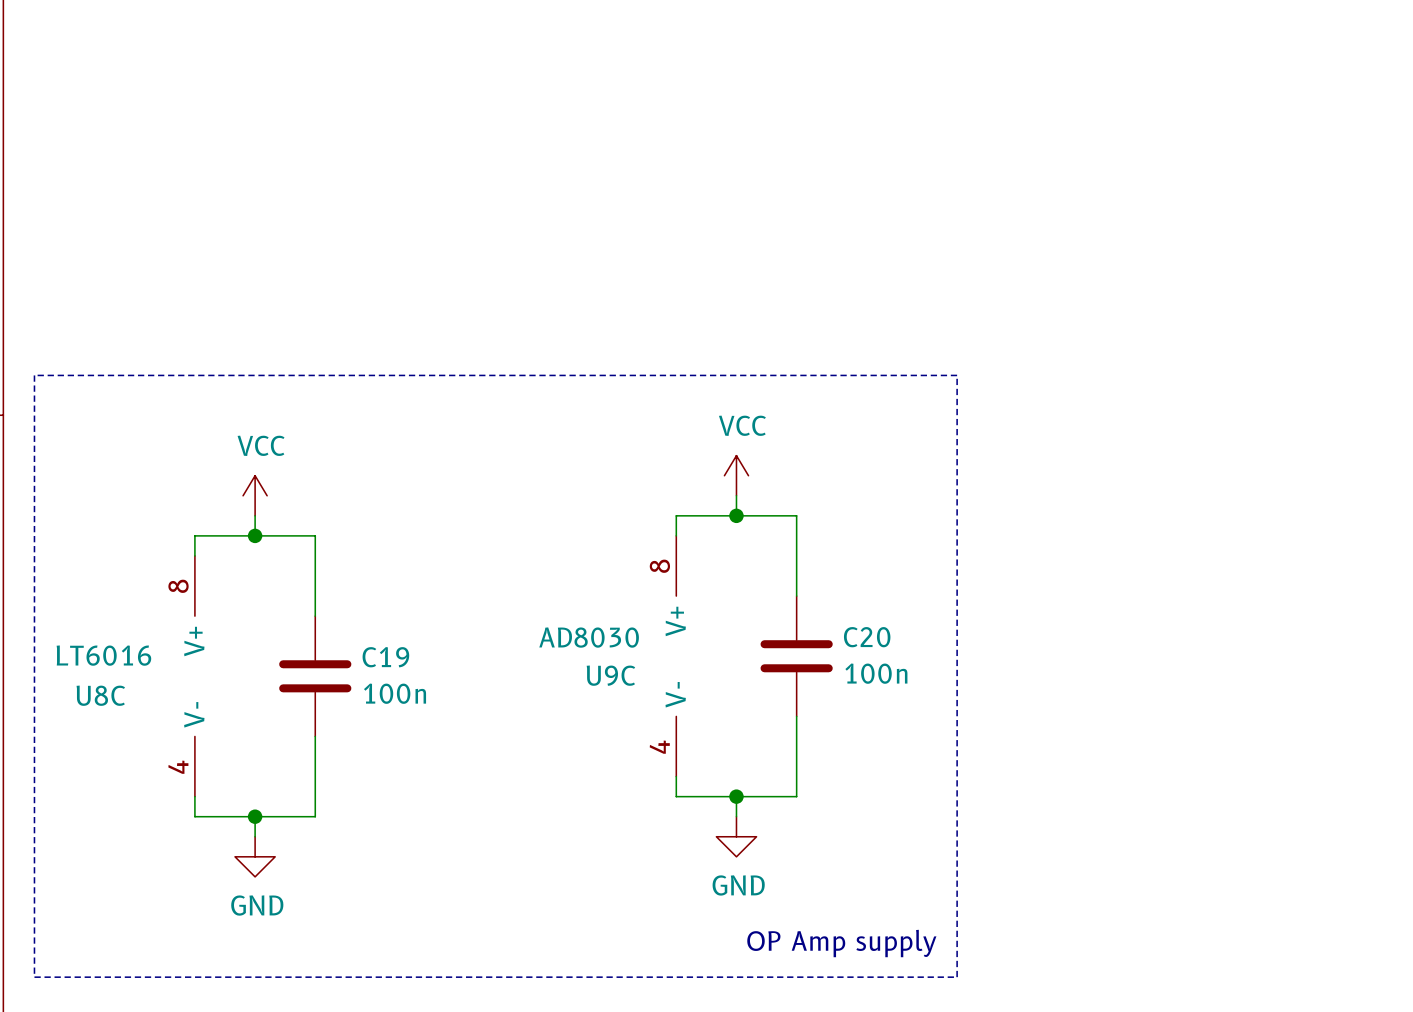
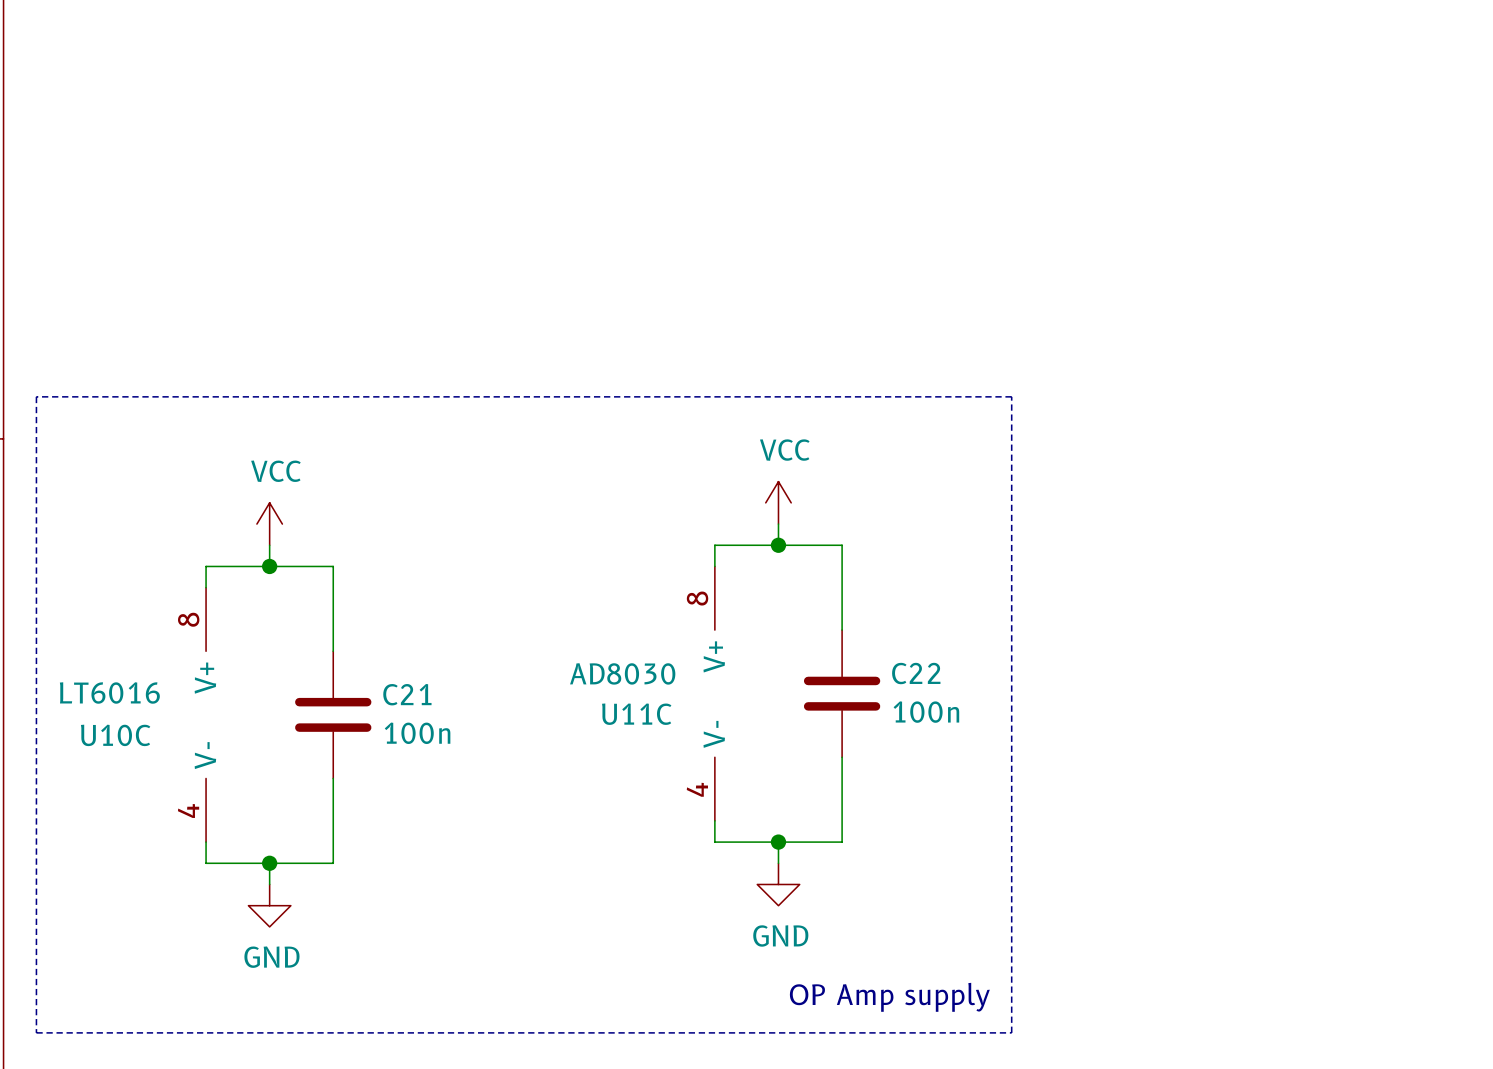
C20 name: C20 (867, 637) -> C22 (916, 673)
C19 name: C19 (385, 657) -> C21 (407, 694)
U9C name: U9C (610, 675) -> U11C (636, 714)
U8C name: U8C (100, 695) -> U10C (115, 735)

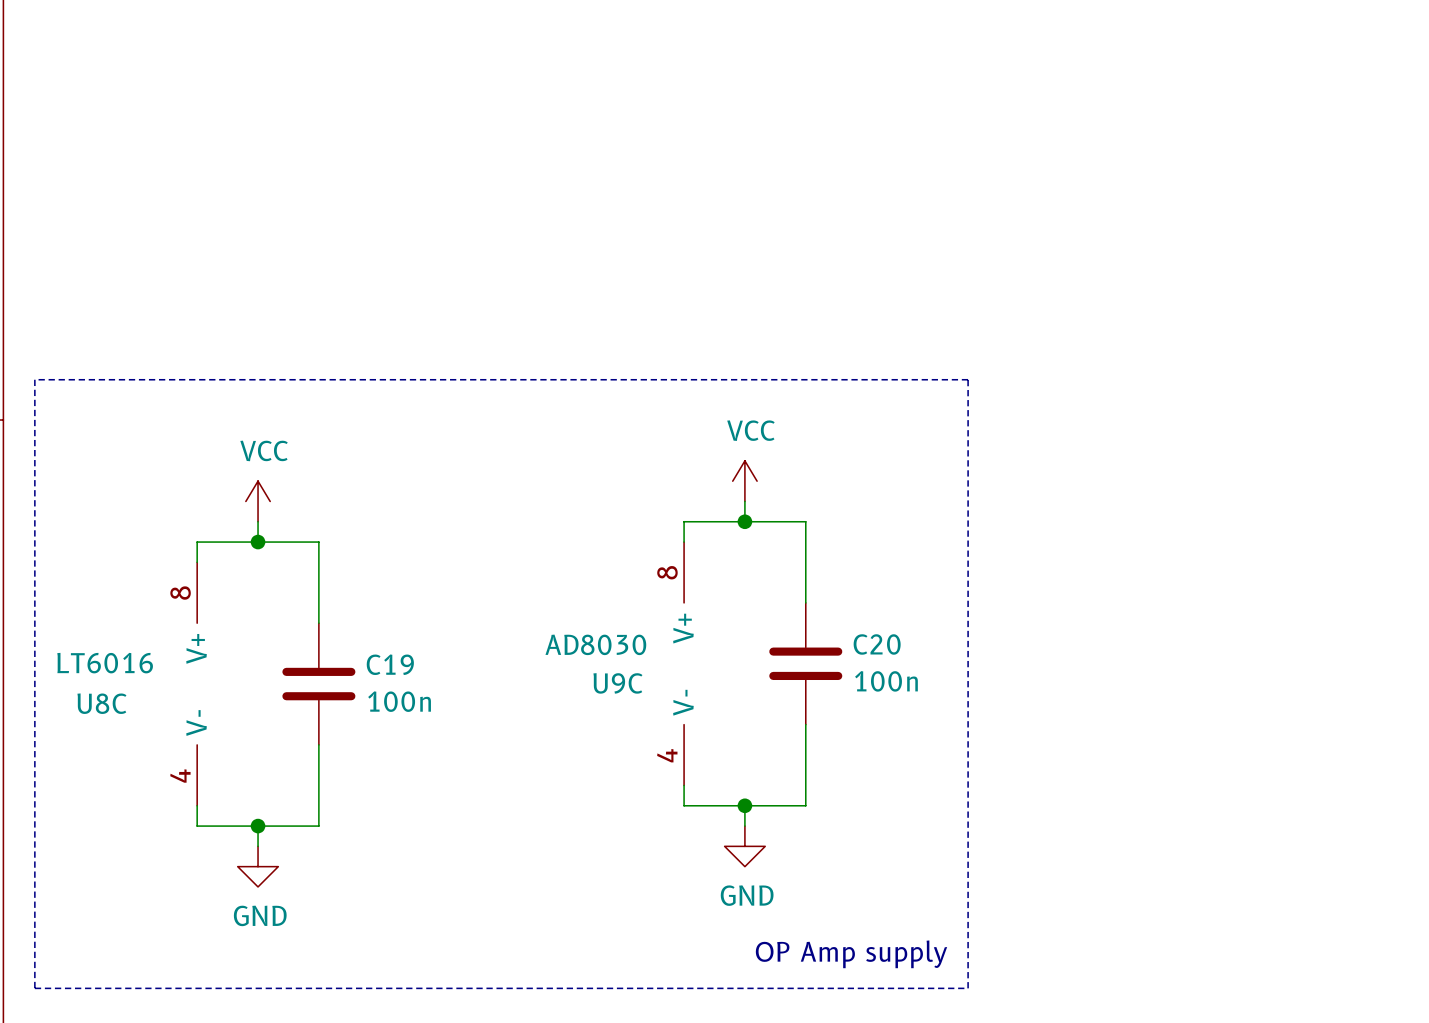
C22 name: C22 (916, 673) -> C20 (877, 644)
C21 name: C21 (407, 694) -> C19 (390, 664)
U11C name: U11C (636, 714) -> U9C (617, 683)
U10C name: U10C (115, 735) -> U8C (101, 703)

